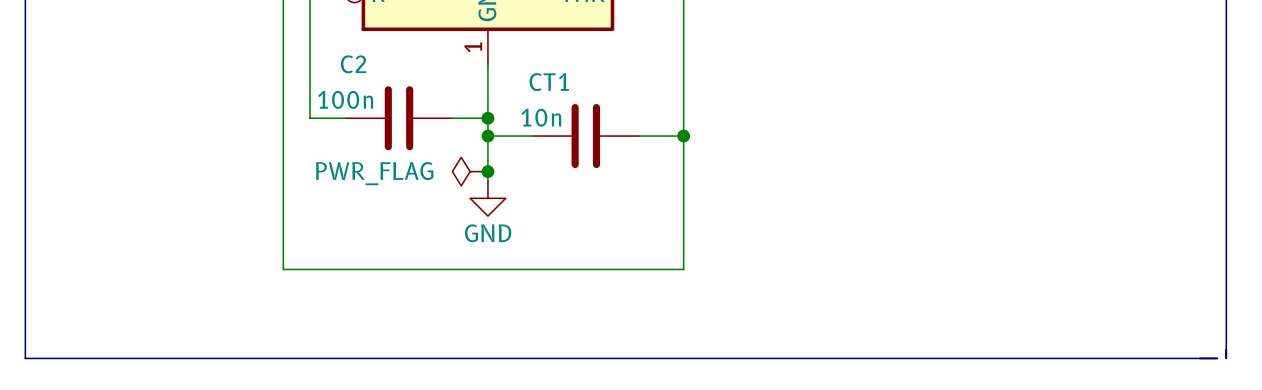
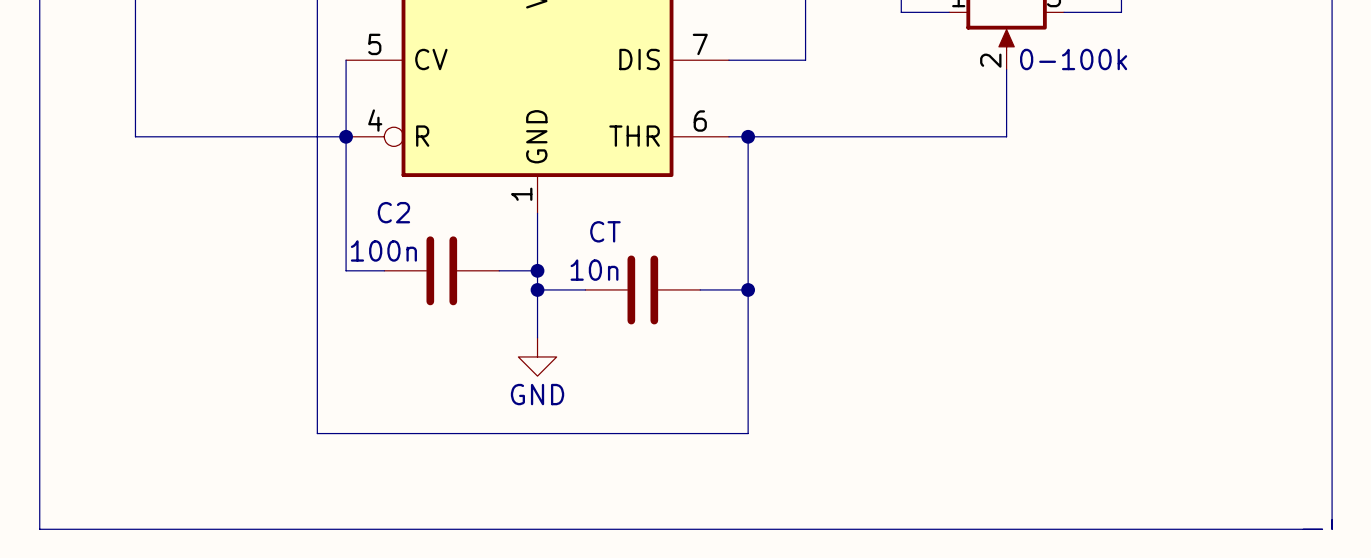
CT1 name: CT1 (549, 82) -> CT (605, 231)
power symbol: PWR_FLAG (470, 171) -> none
junction: (487, 171) -> none

